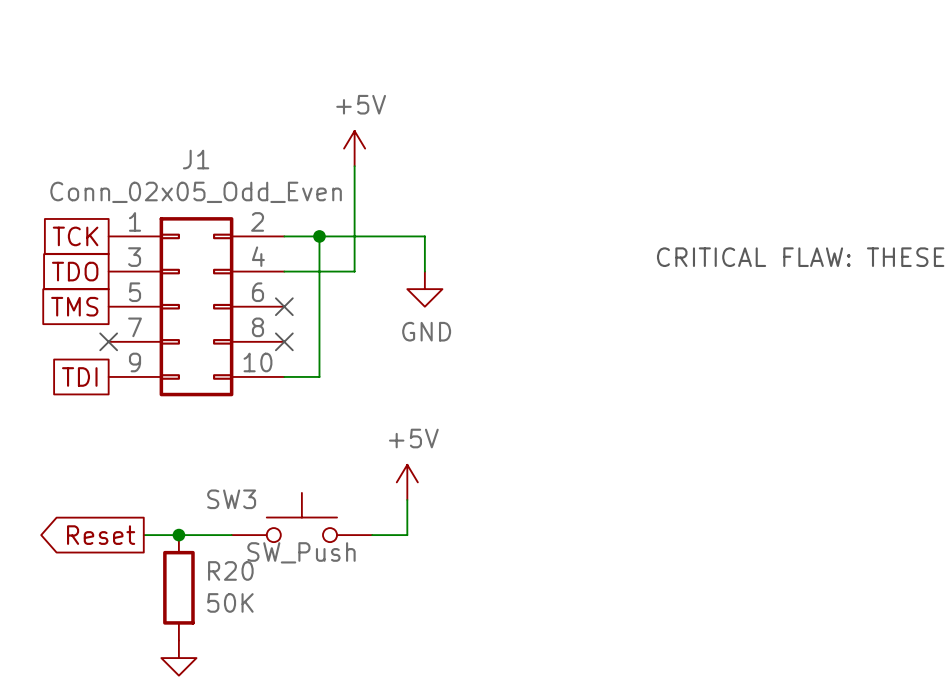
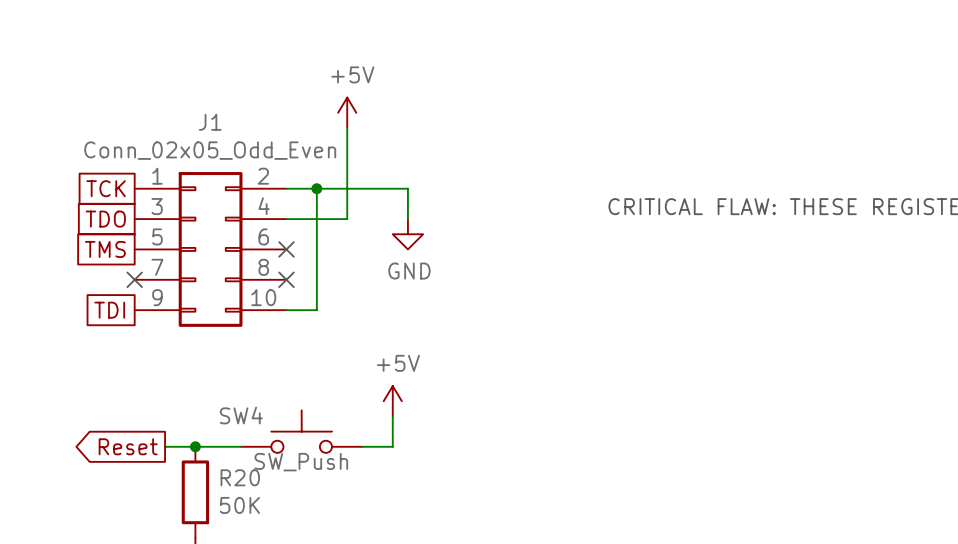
SW3 name: SW3 (231, 499) -> SW4 (241, 415)

